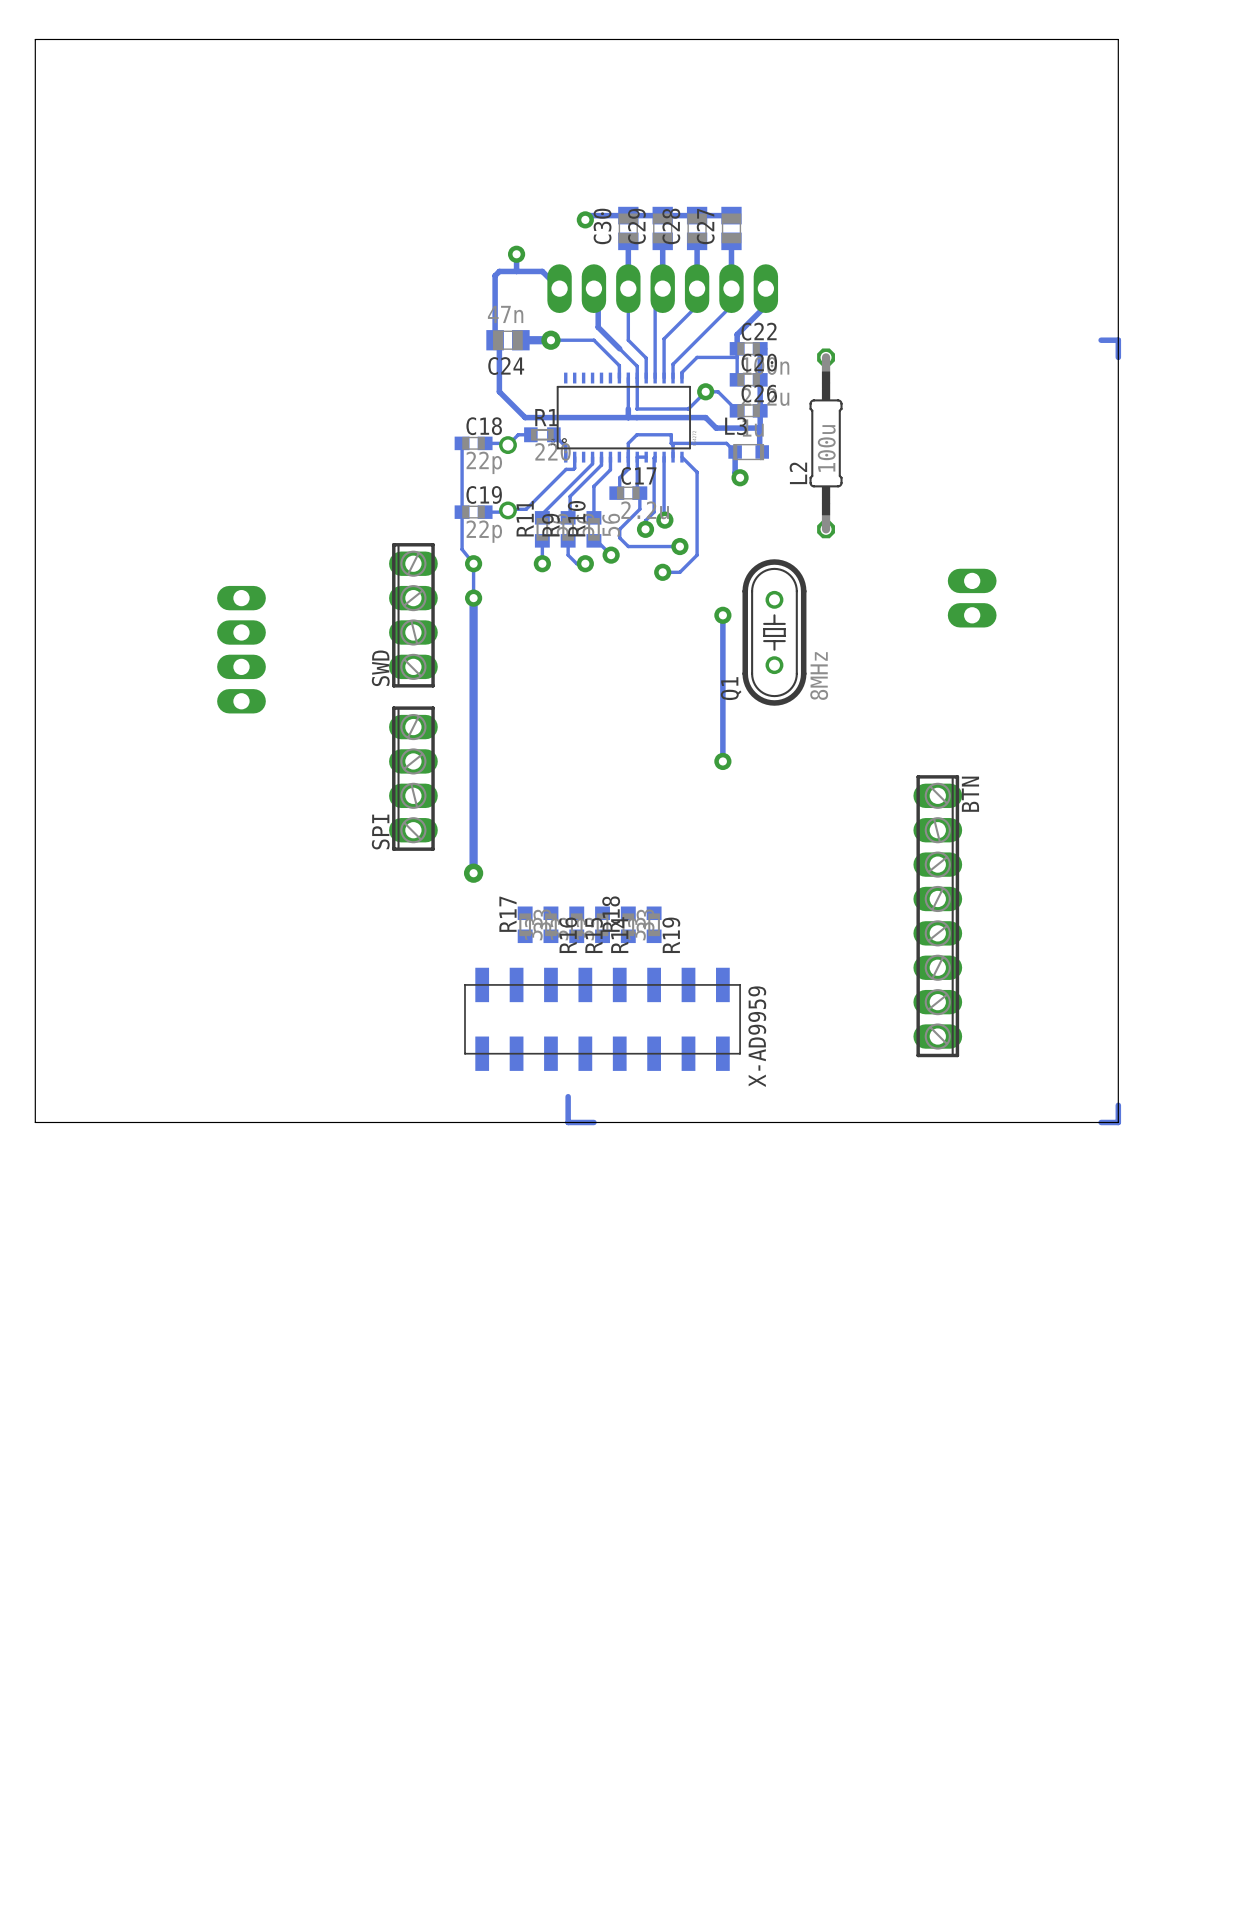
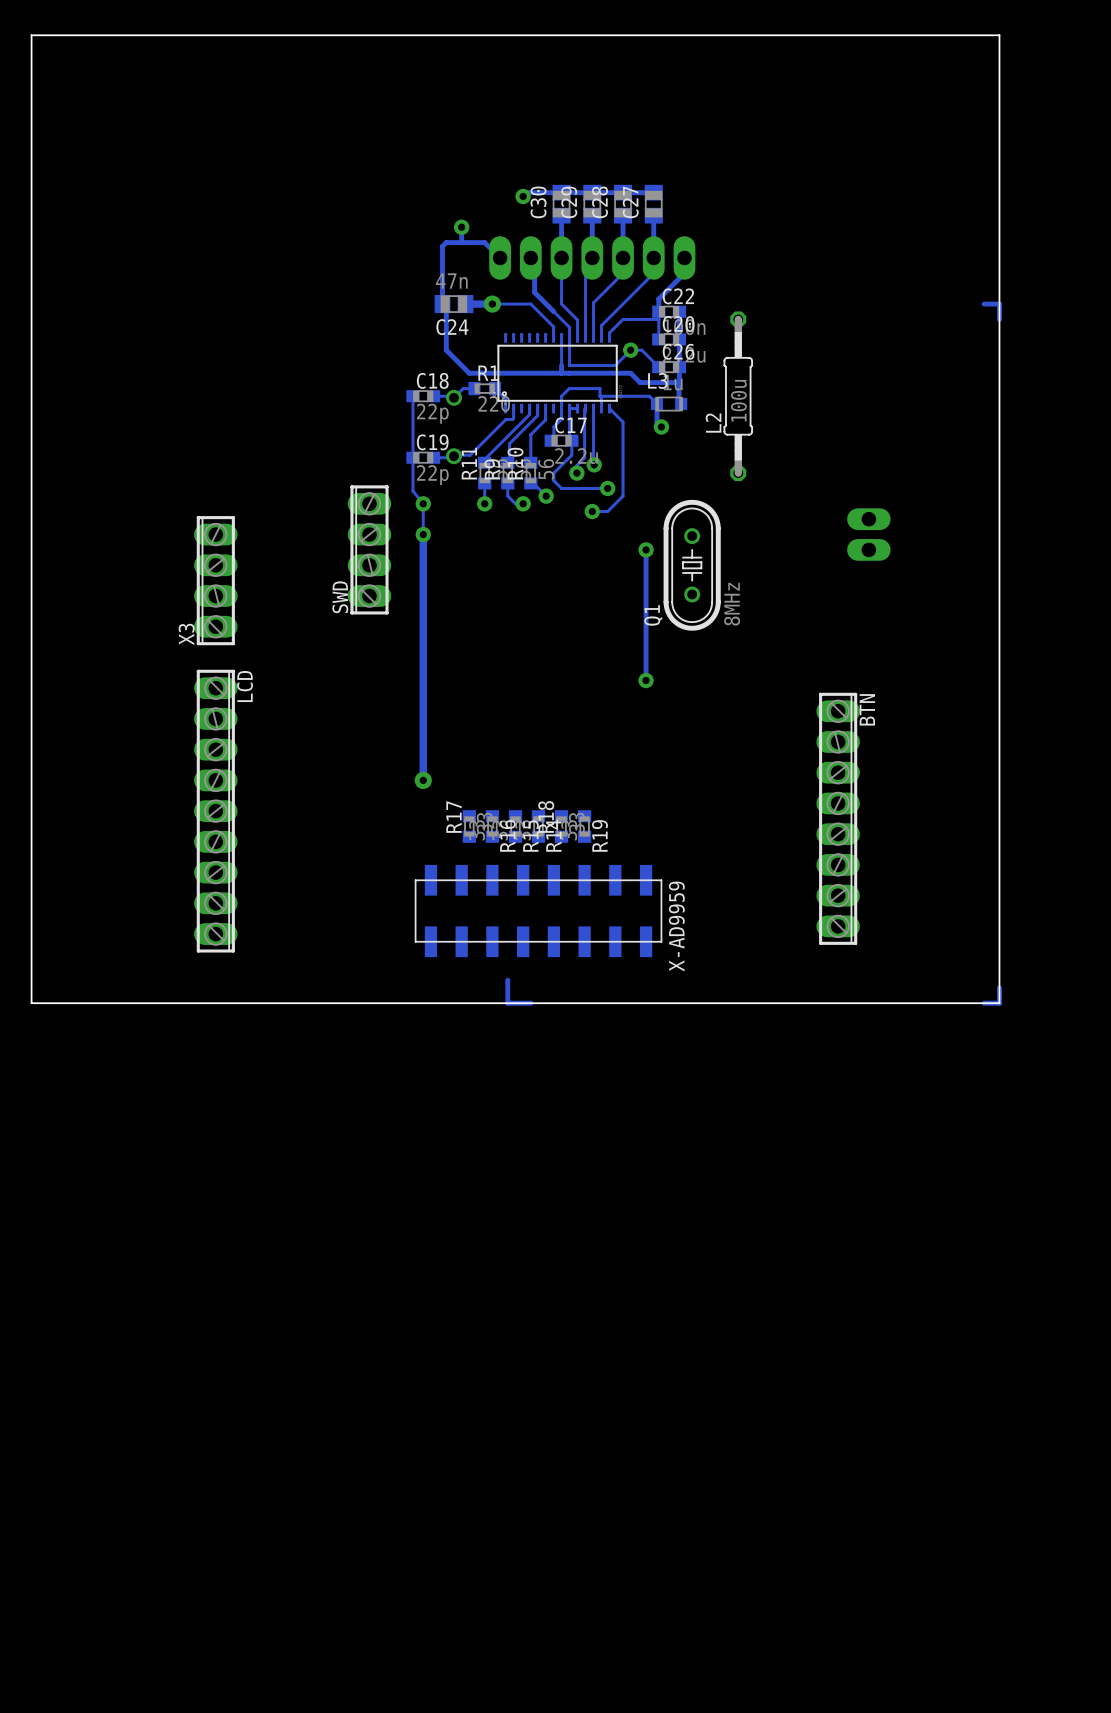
X3 side: top (241, 649) -> bottom (215, 580)
SPI: (413, 778) -> none
LCD: none -> (215, 811)

